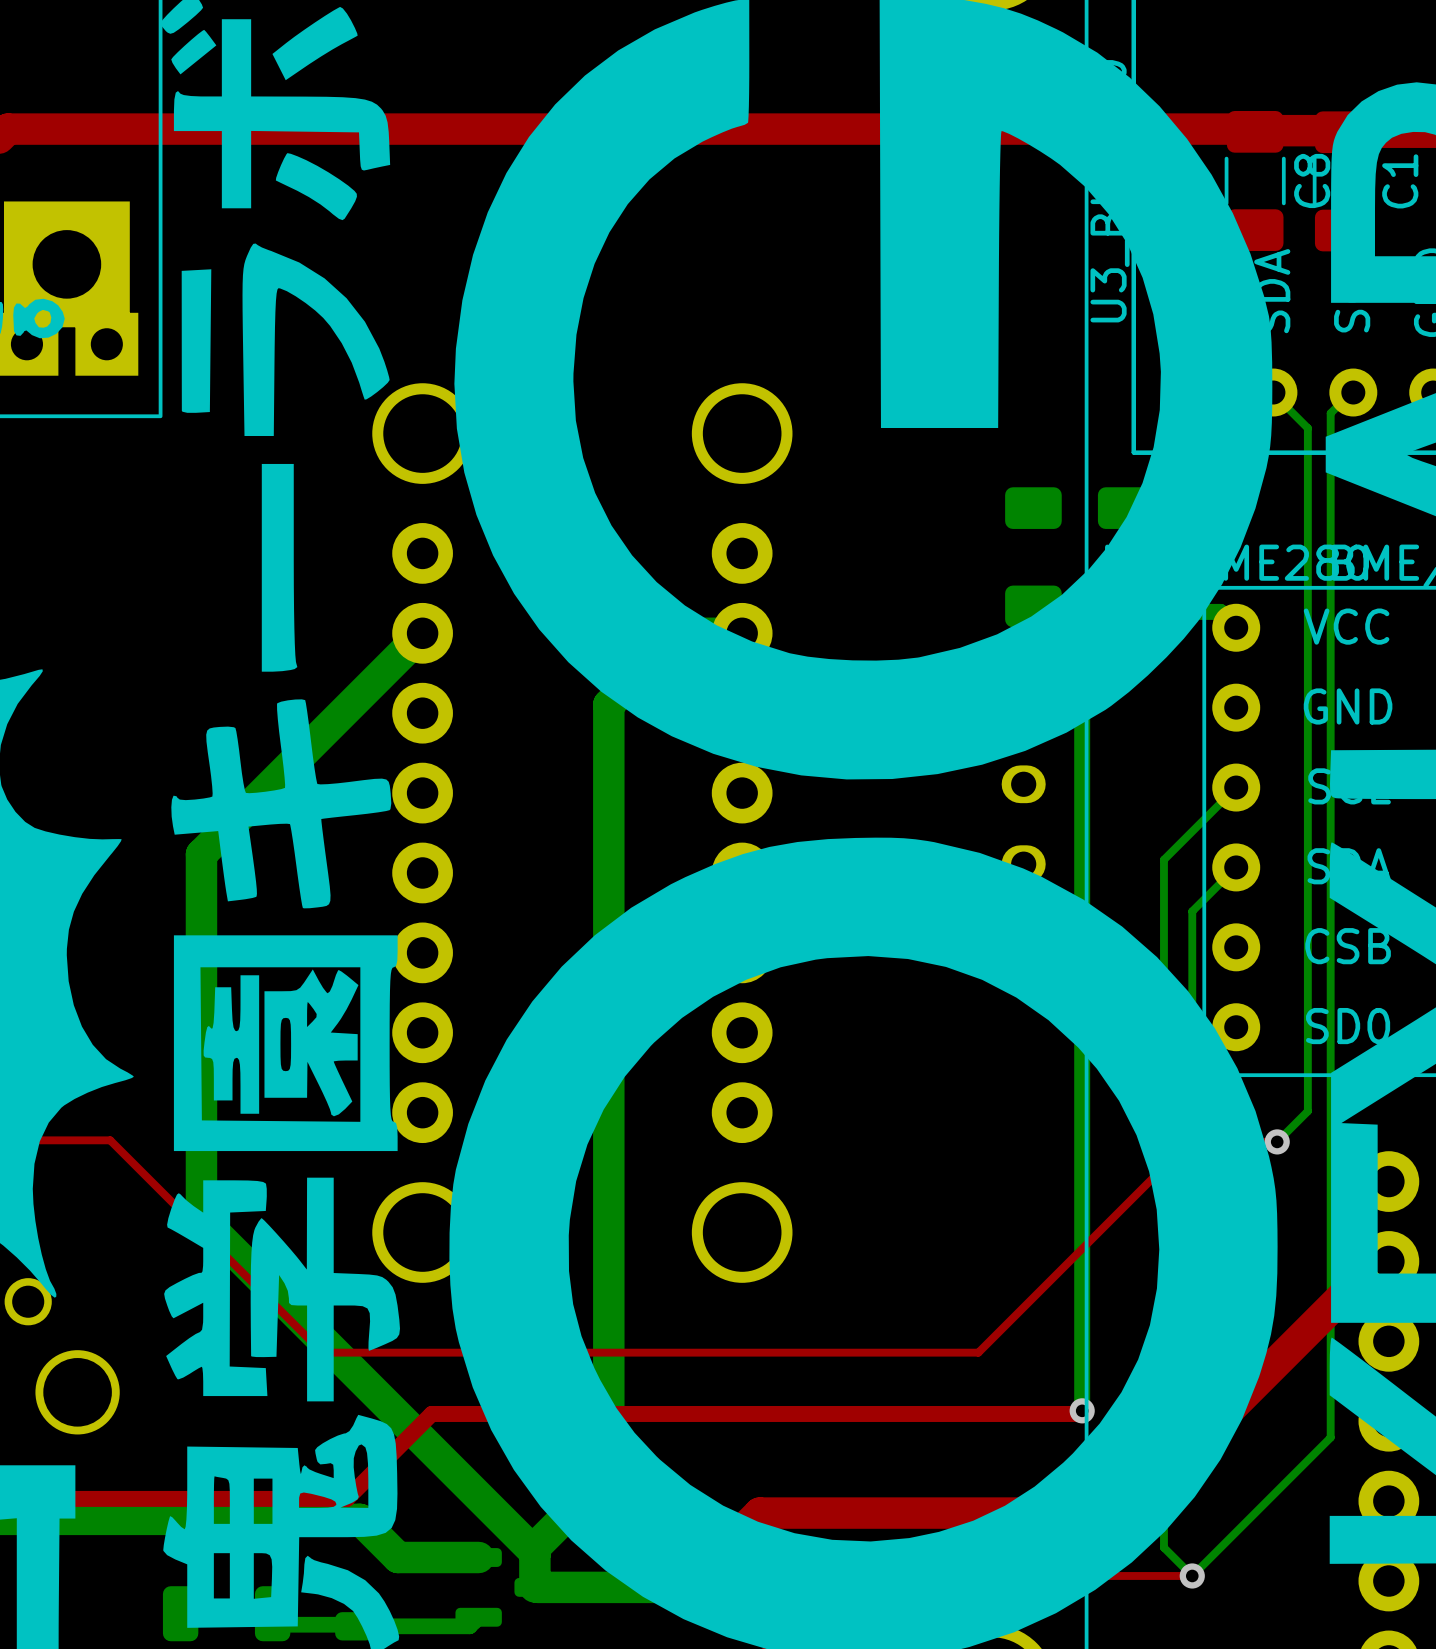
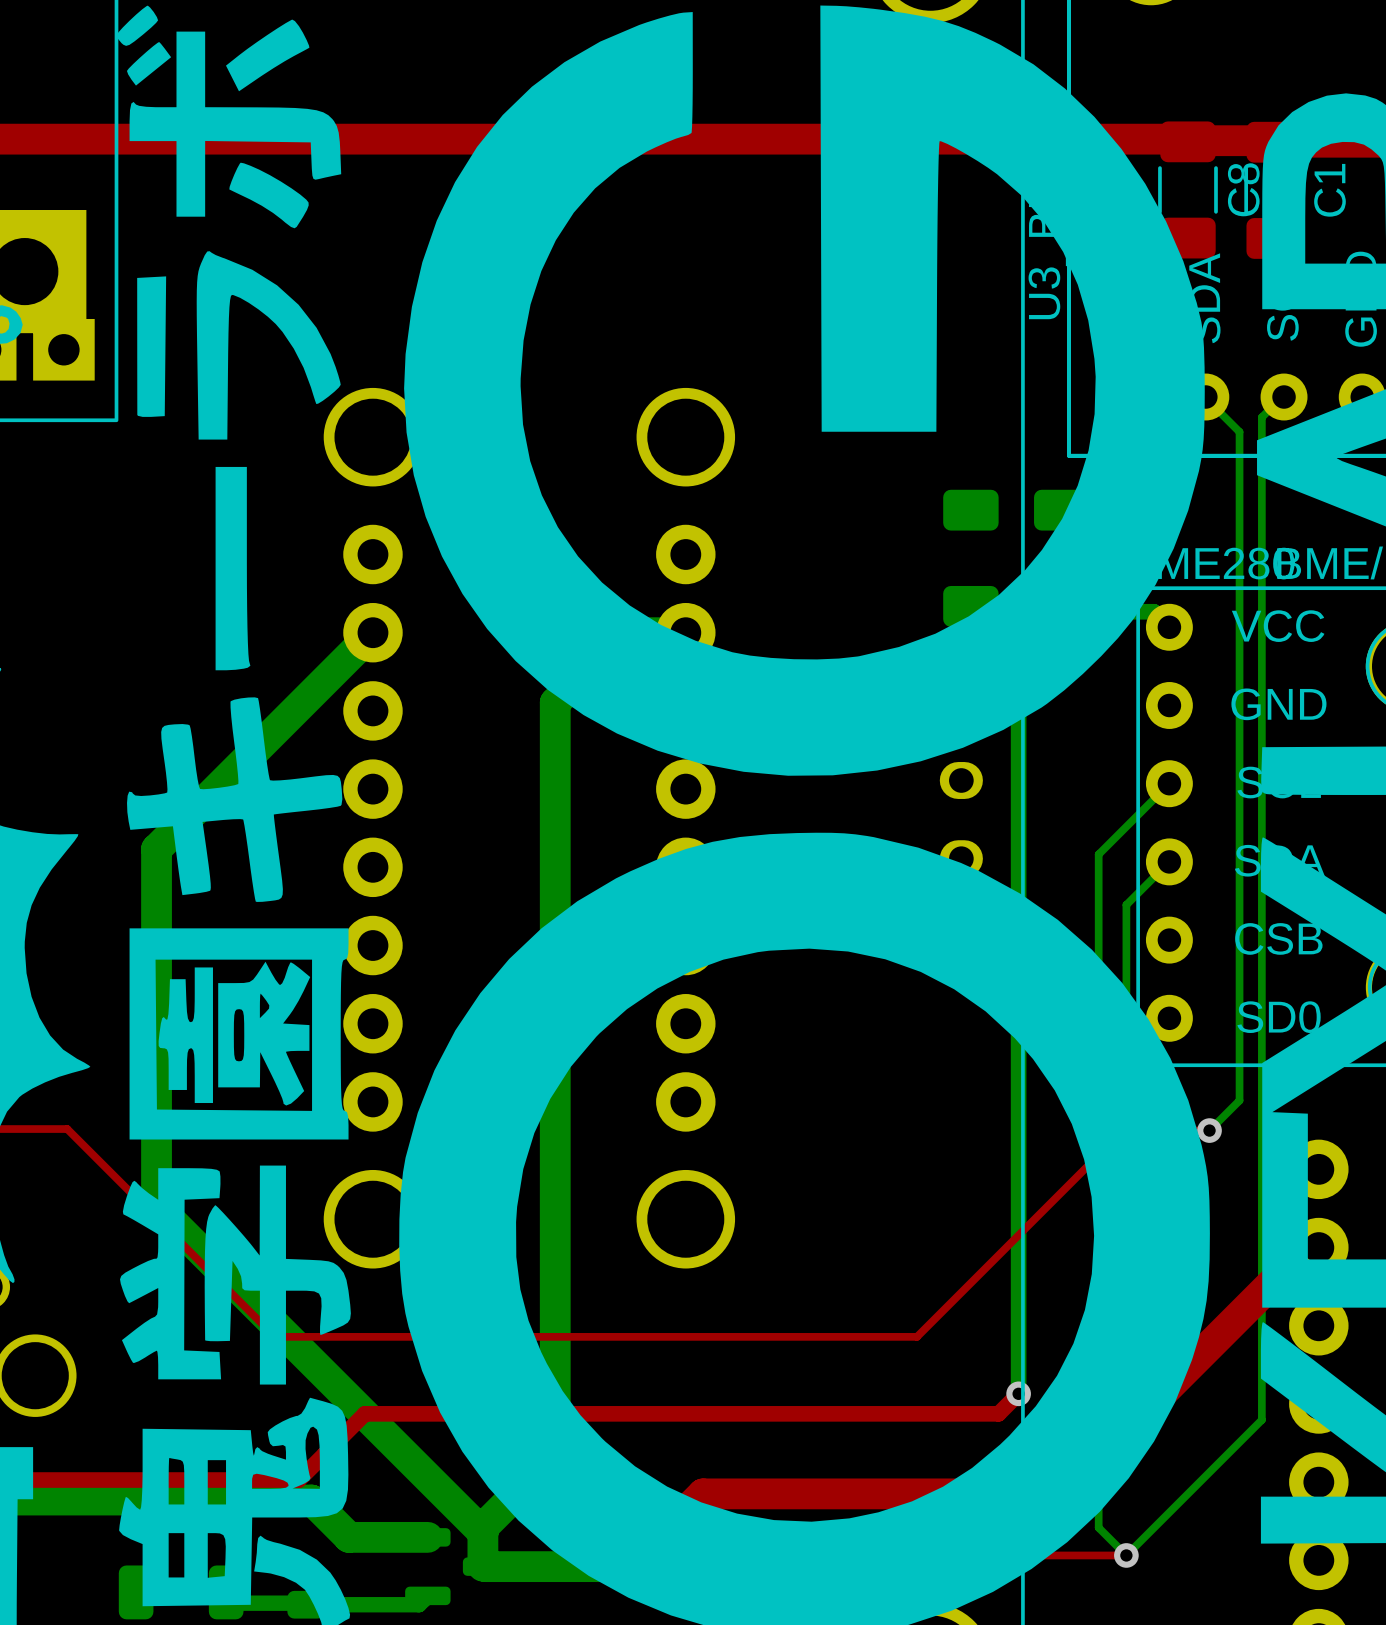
top track: (1079, 1413) (431, 1413) (414, 1431) -> (1015, 1396) (998, 1413) (365, 1413)

